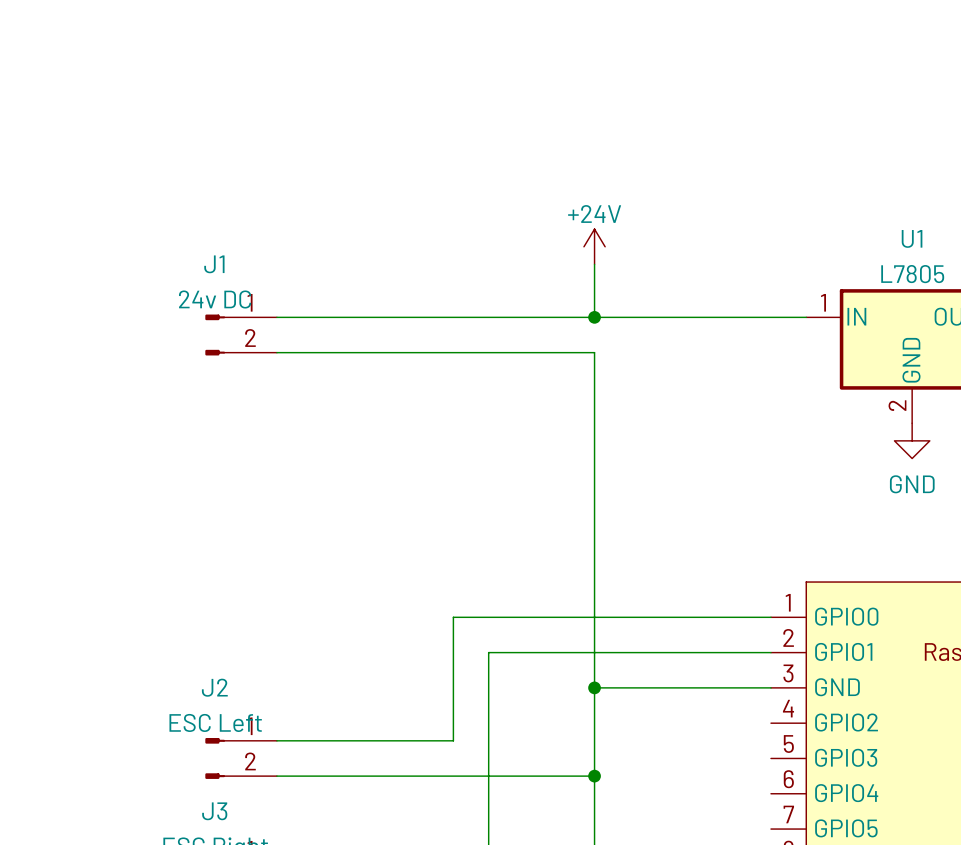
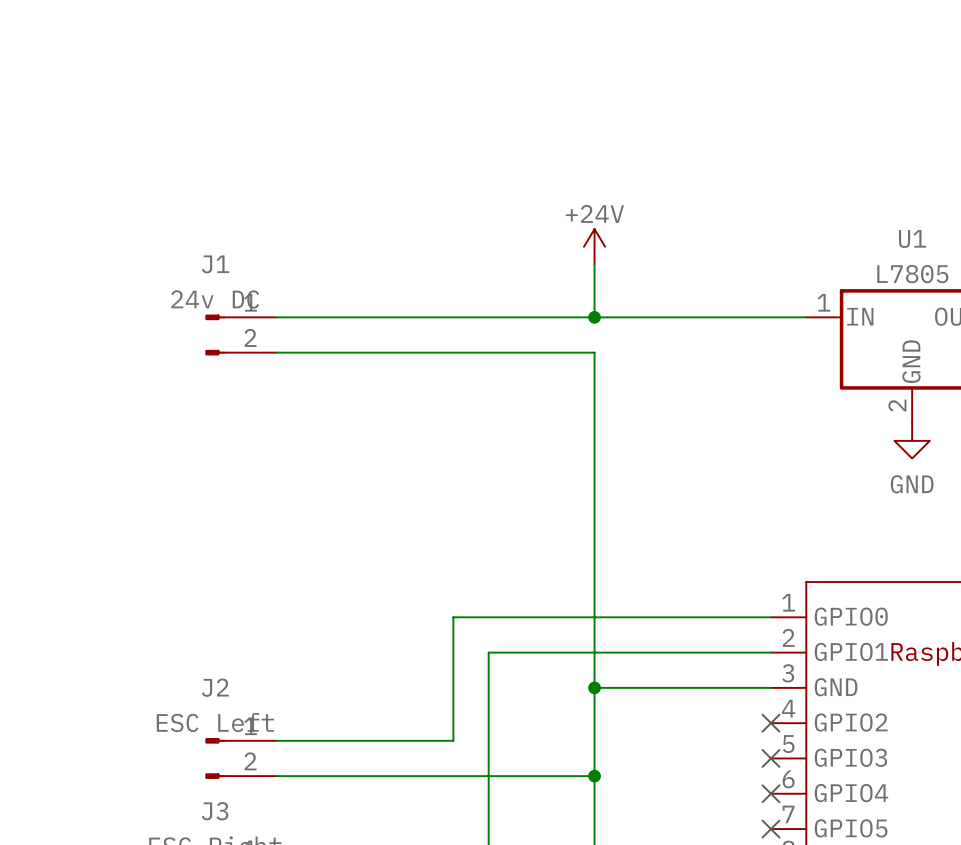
no-connect mark: none -> (770, 723)
no-connect mark: none -> (770, 758)
no-connect mark: none -> (770, 793)
no-connect mark: none -> (770, 829)

